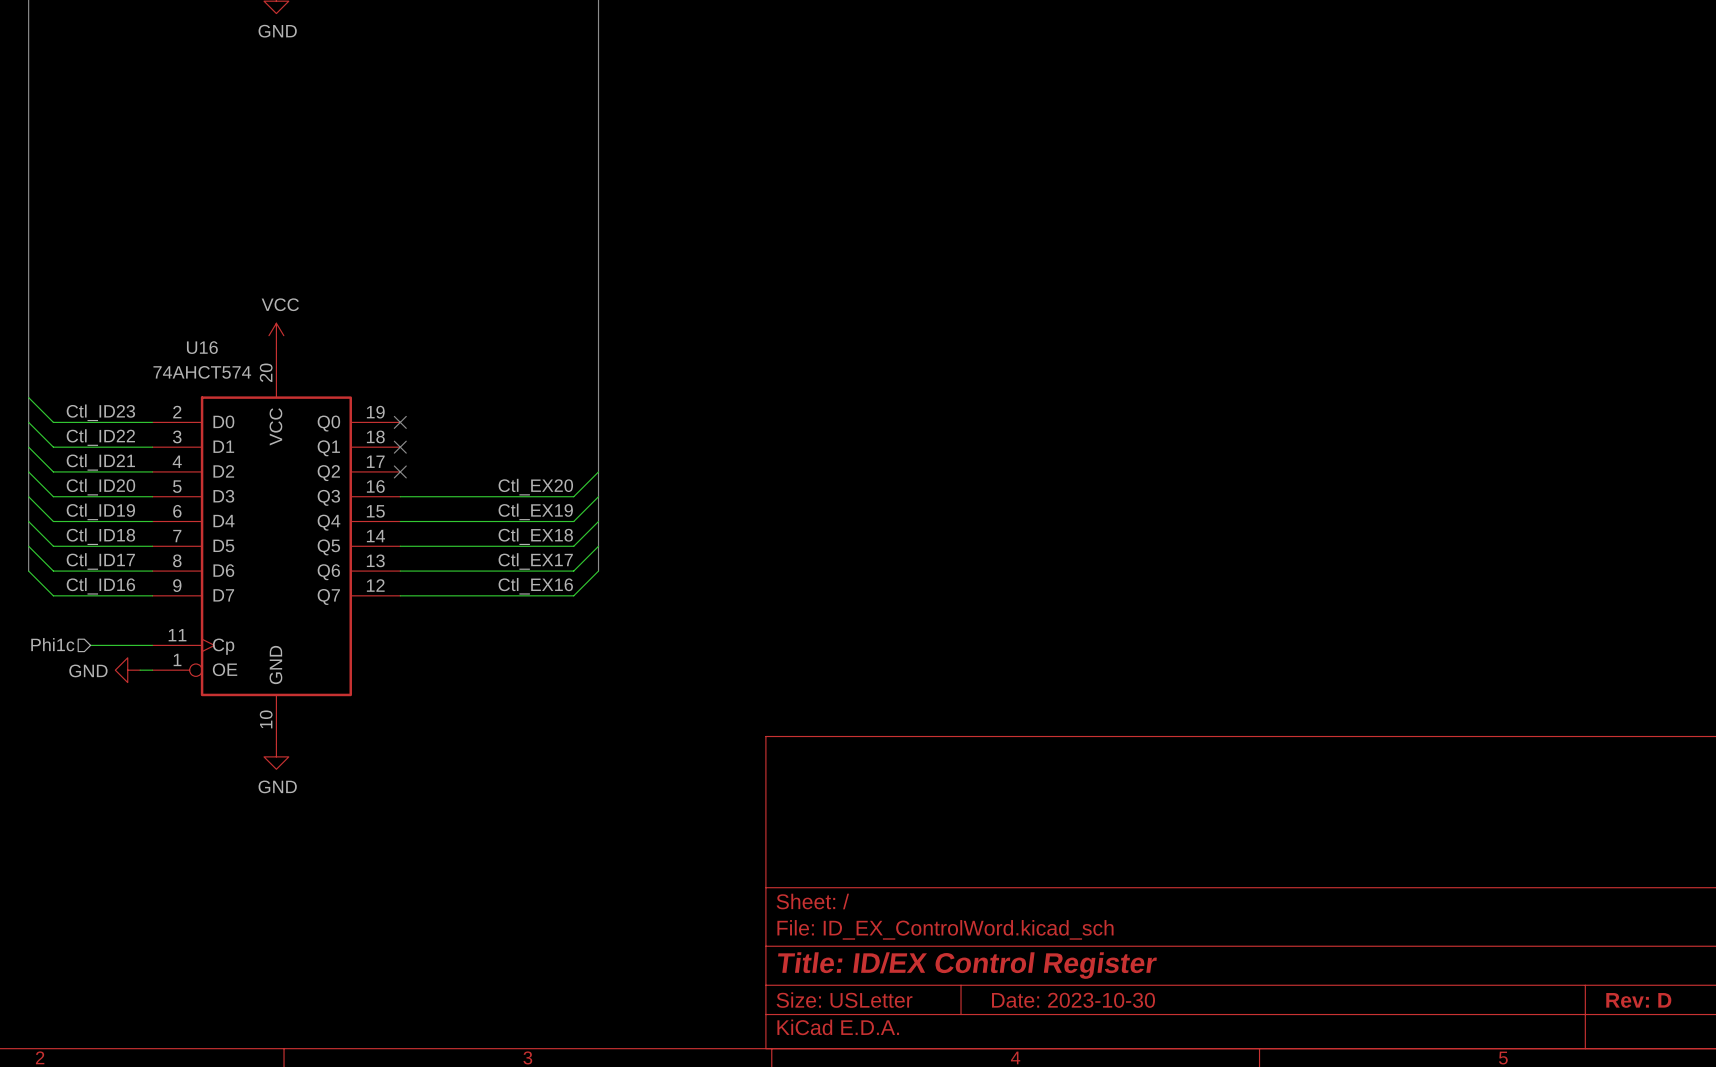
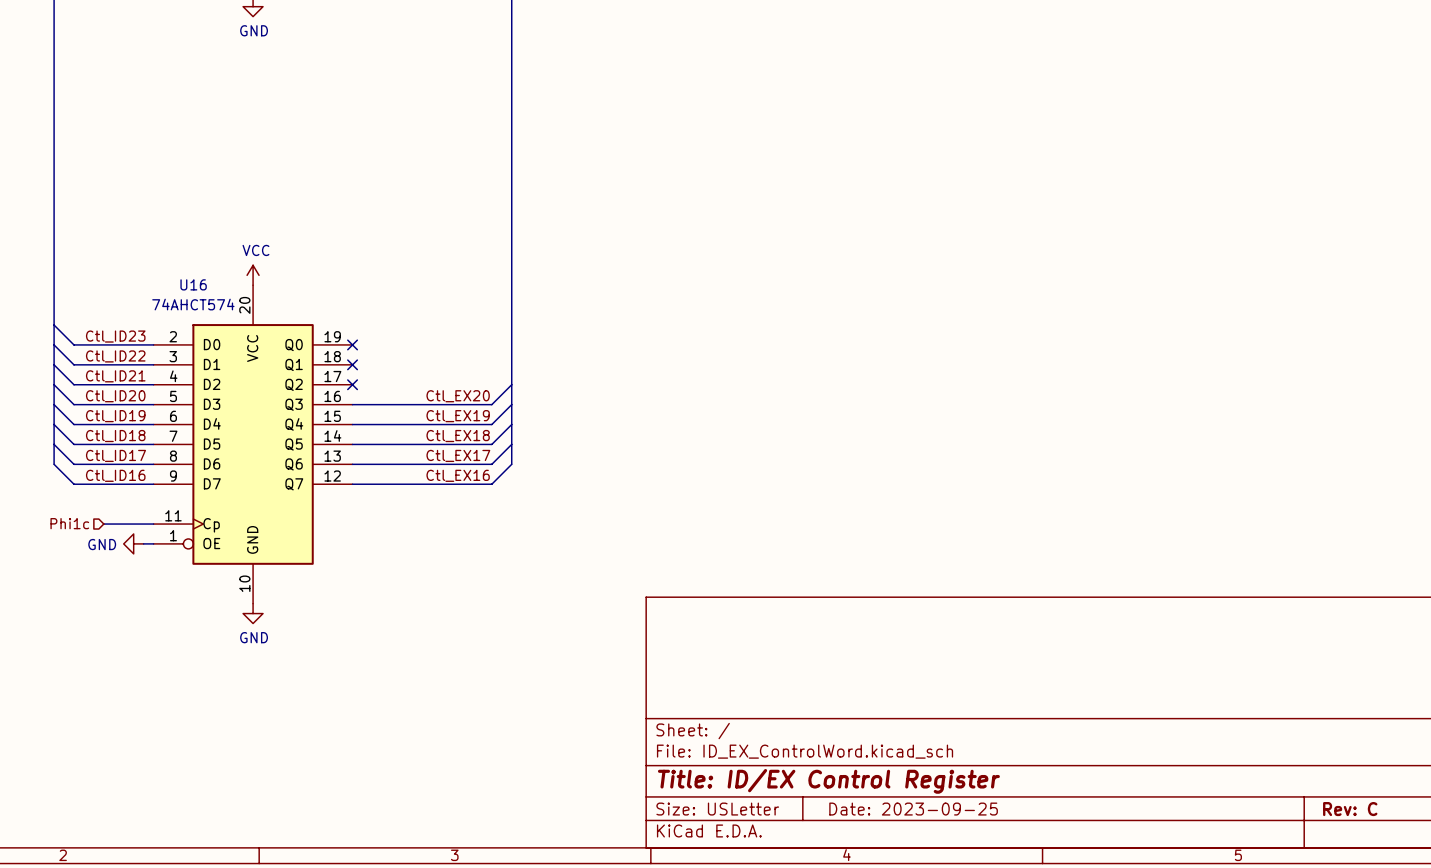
title block: Date: 2023-10-30 (1073, 1000) -> Date: 2023-09-25 (913, 809)
title block: Rev: D (1638, 1000) -> Rev: C (1350, 809)

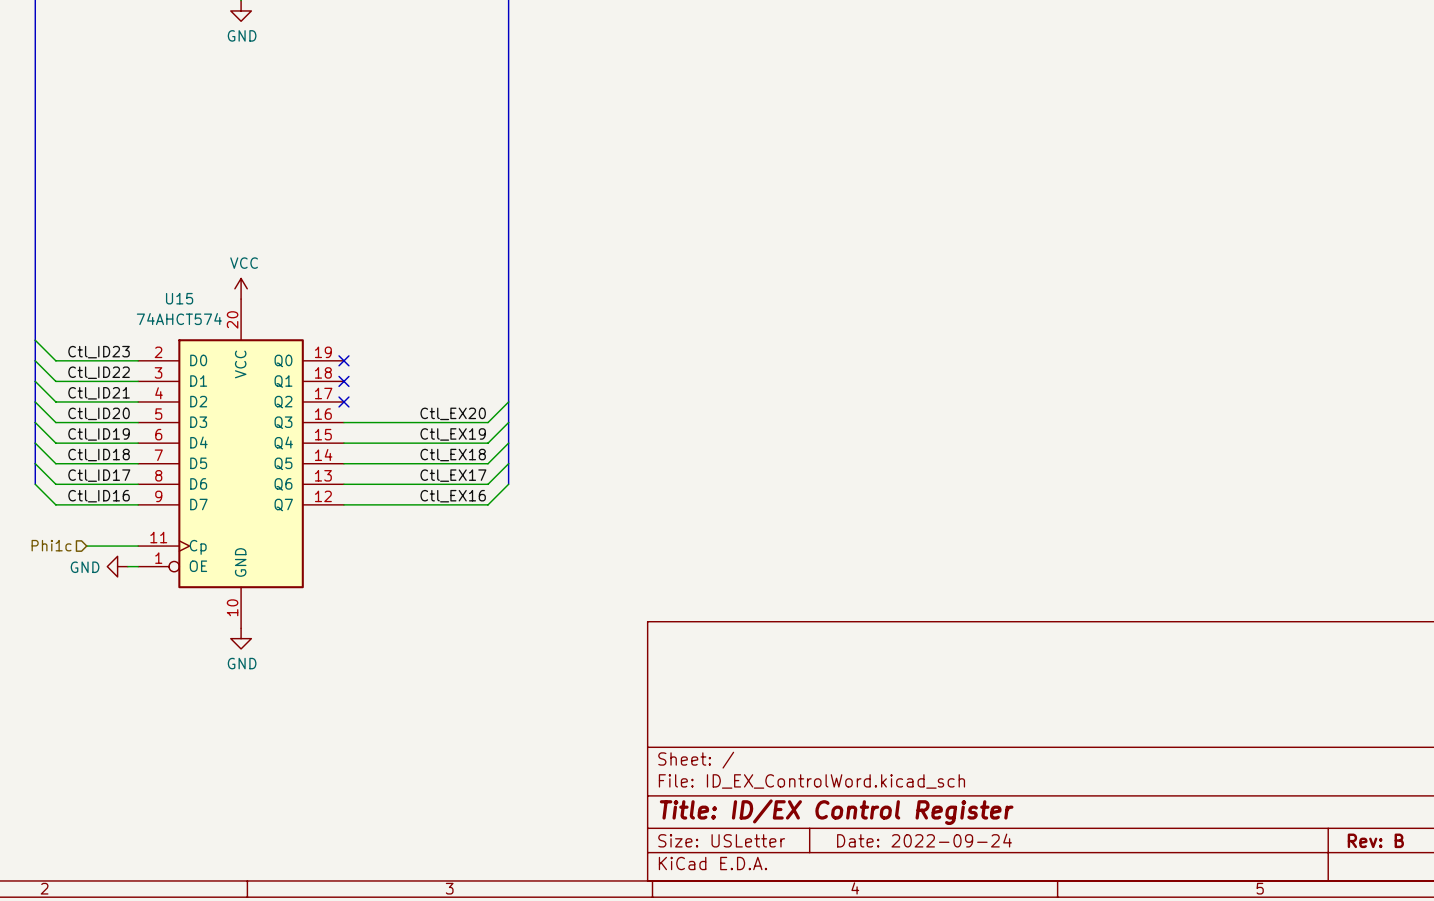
U16 name: U16 (193, 284) -> U15 (179, 298)
title block: Date: 2023-09-25 (913, 809) -> Date: 2022-09-24 (924, 840)
title block: Rev: C (1350, 809) -> Rev: B (1375, 840)

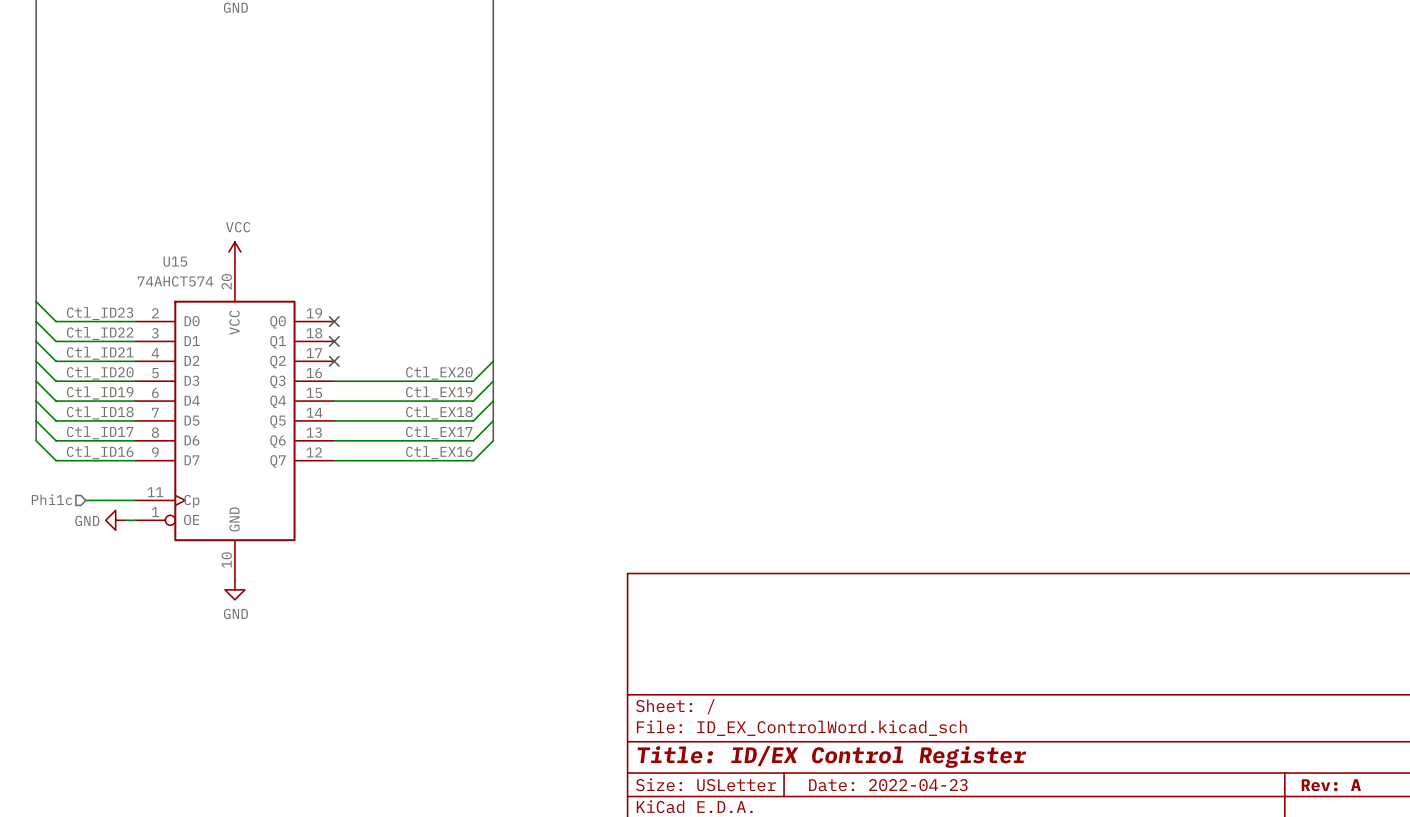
title block: Date: 2022-09-24 (924, 840) -> Date: 2022-04-23 (888, 785)
title block: Rev: B (1375, 840) -> Rev: A (1331, 785)

